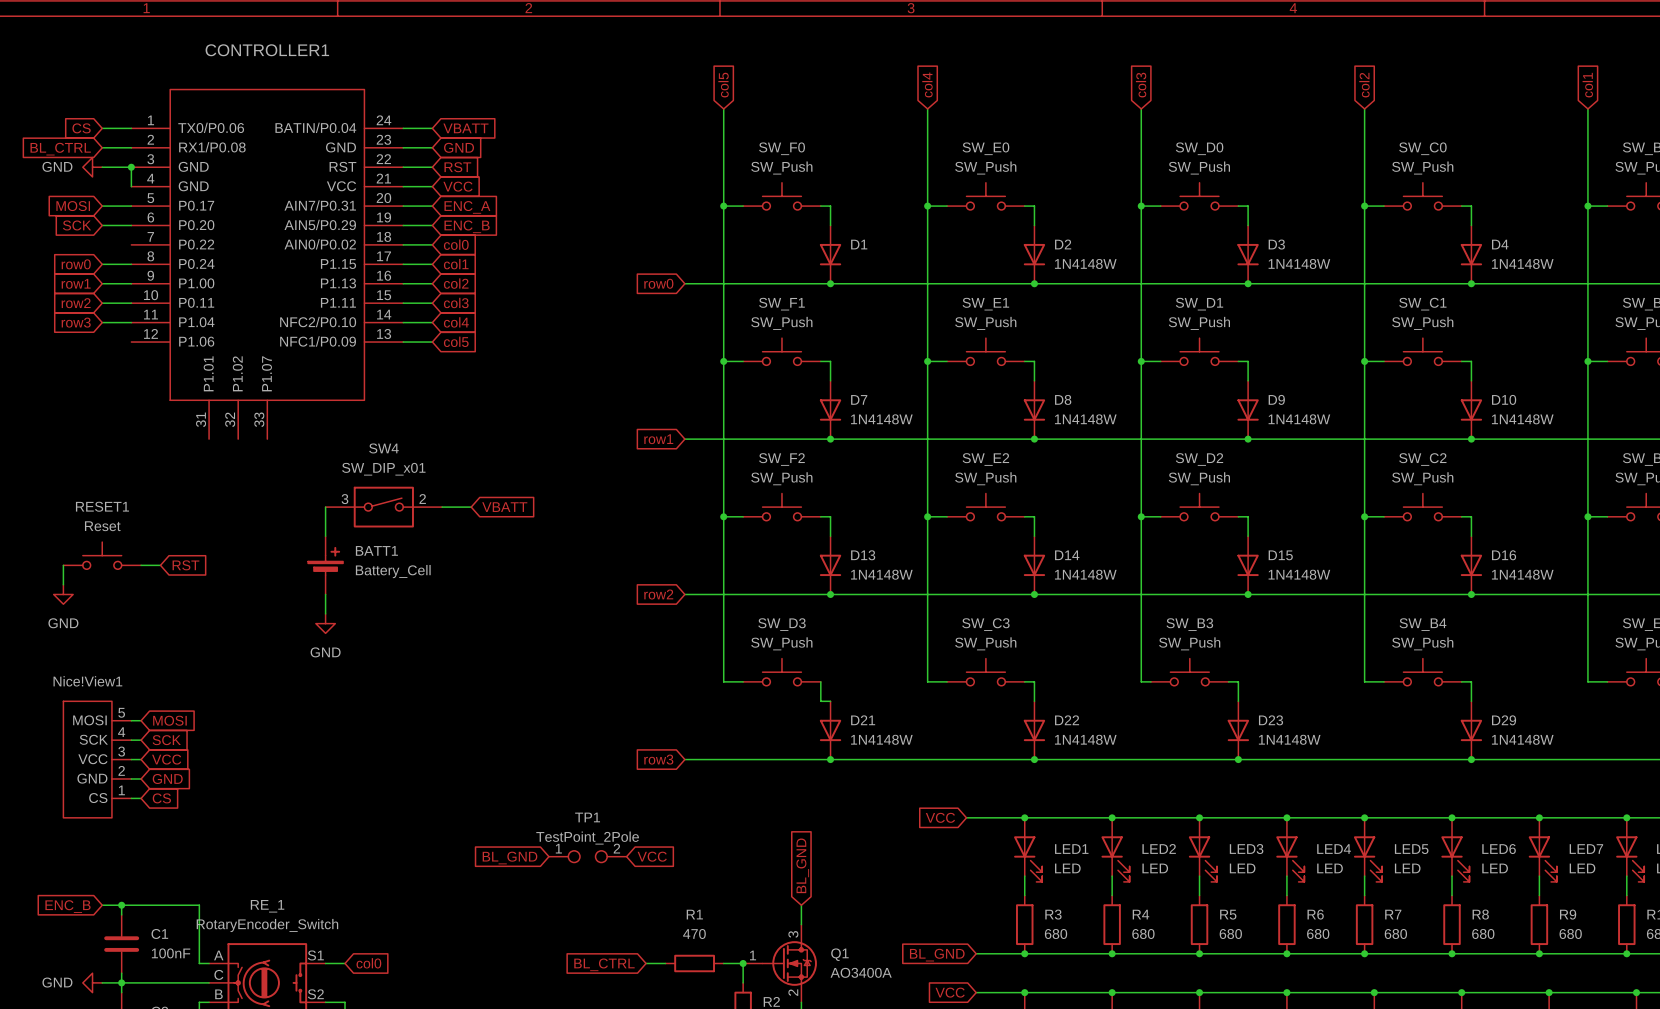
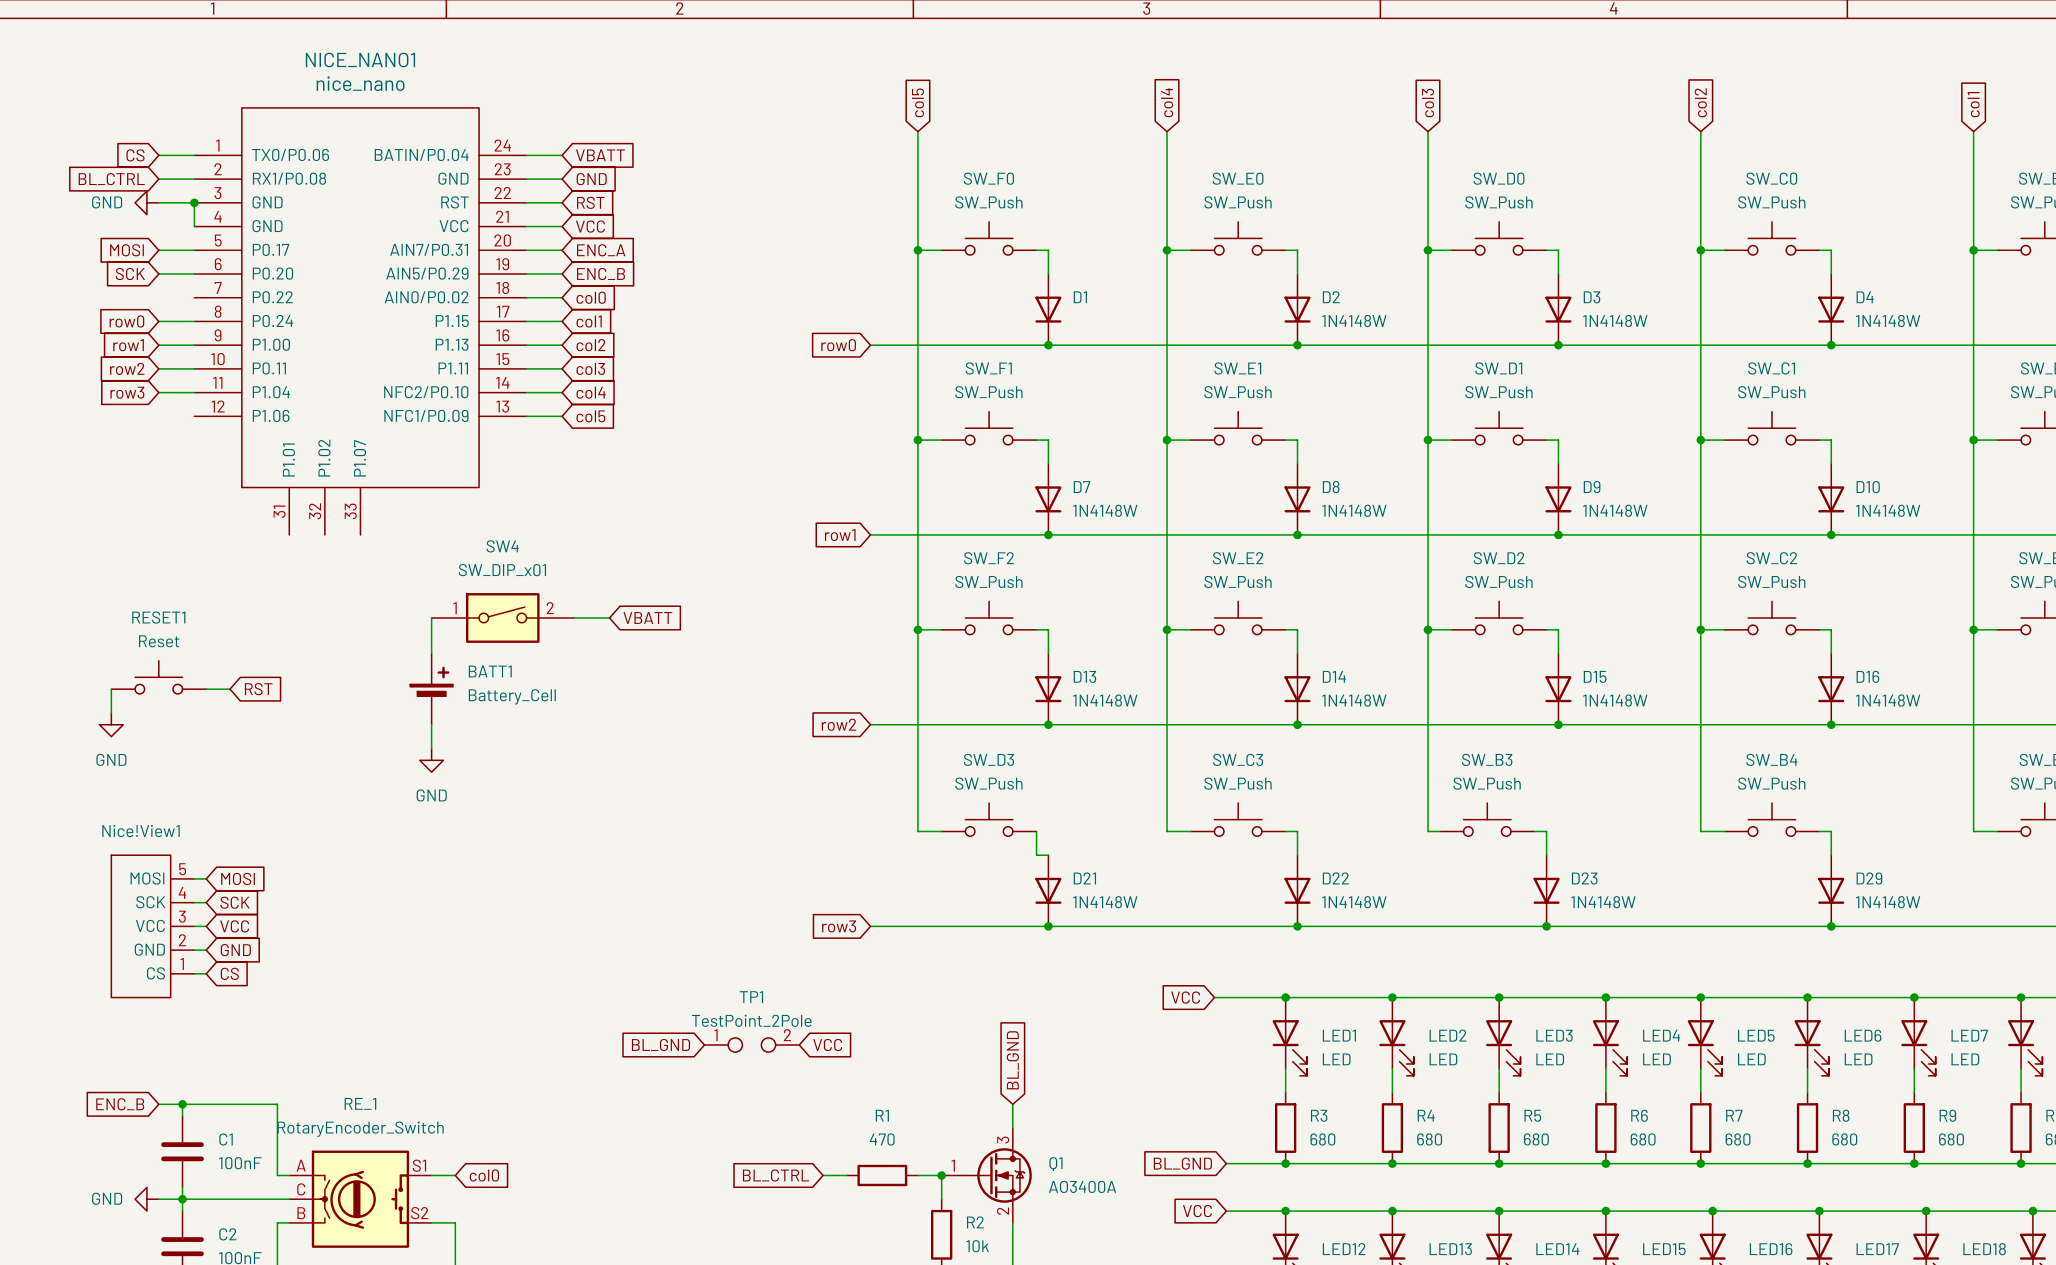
CONTROLLER1 name: CONTROLLER1 (267, 50) -> NICE_NANO1 (360, 59)
CONTROLLER1 value: none -> nice_nano (360, 83)
SW4 pin number: 3 (344, 499) -> 1 (455, 608)

